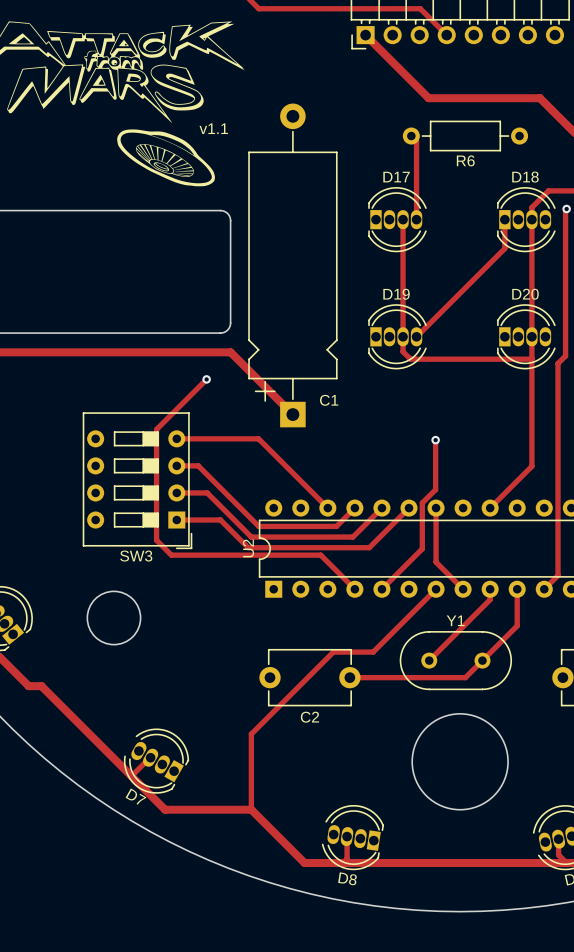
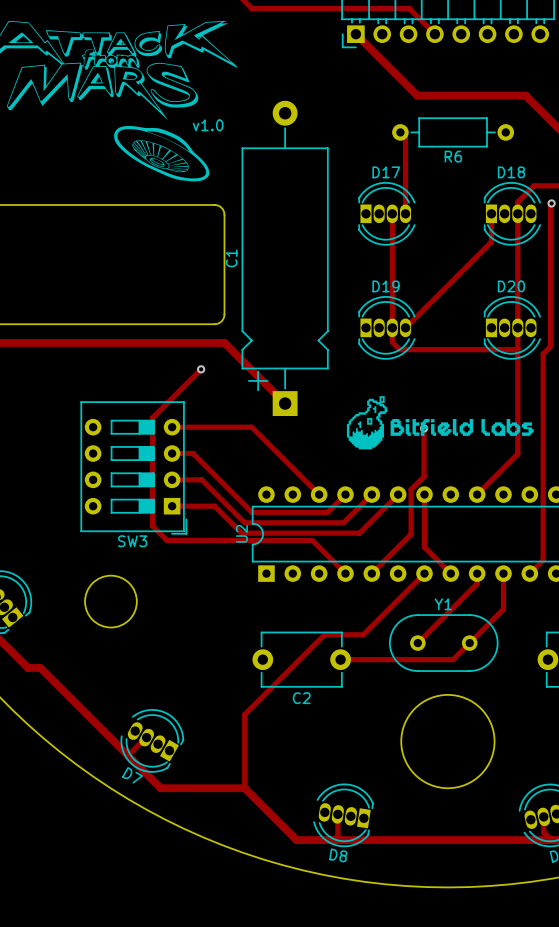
text: v1.1 (213, 128) -> v1.0 (208, 125)
C1 name rotation: 0° (329, 400) -> 90° counterclockwise (231, 258)
C1 name position: C1 (329, 400) -> C1 (231, 258)
drawing: none -> [346, 396, 534, 450]

